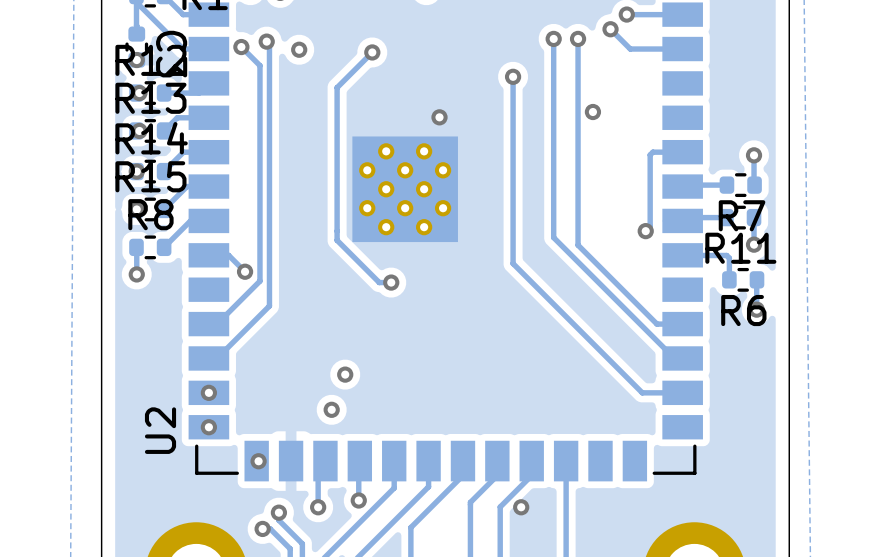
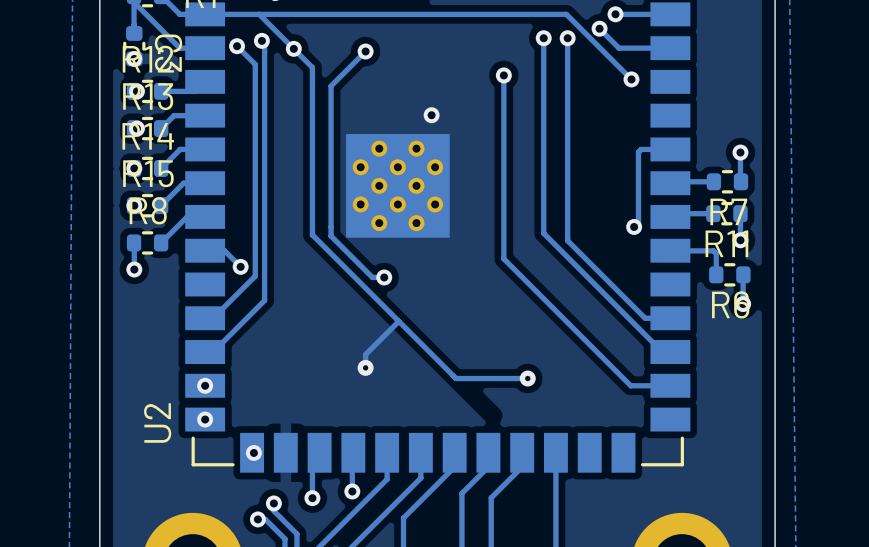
track: none -> (205, 14) (566, 14) (631, 79)
track: none -> (259, 14) (312, 67) (312, 234) (456, 378) (527, 378)
via position: (592, 112) -> (631, 79)
track: none -> (398, 321) (365, 354) (365, 367)
via: (345, 374) -> none
via: none -> (365, 367)
via: none -> (527, 378)
via: (331, 409) -> none
via: (521, 507) -> none

